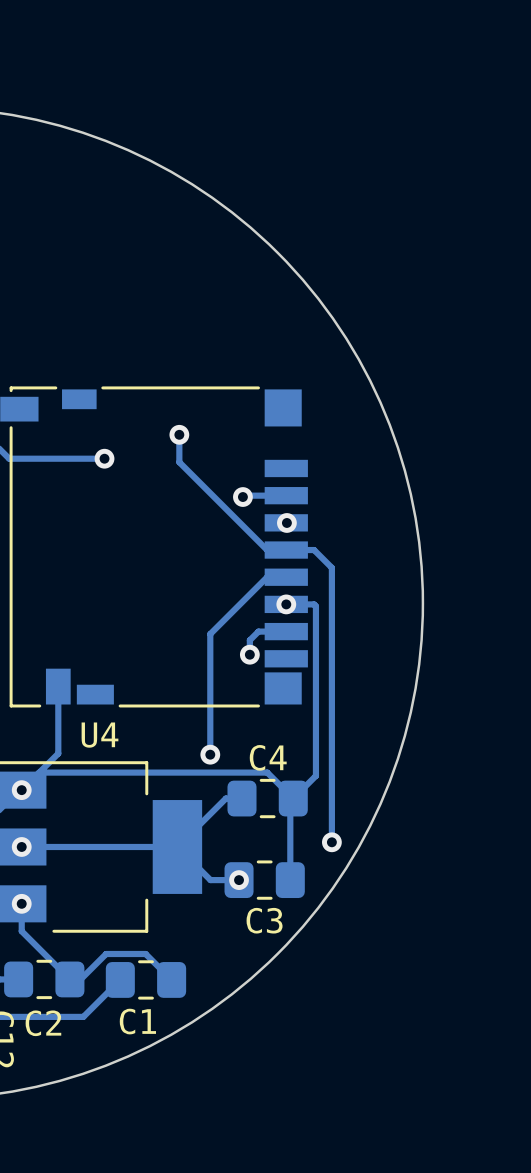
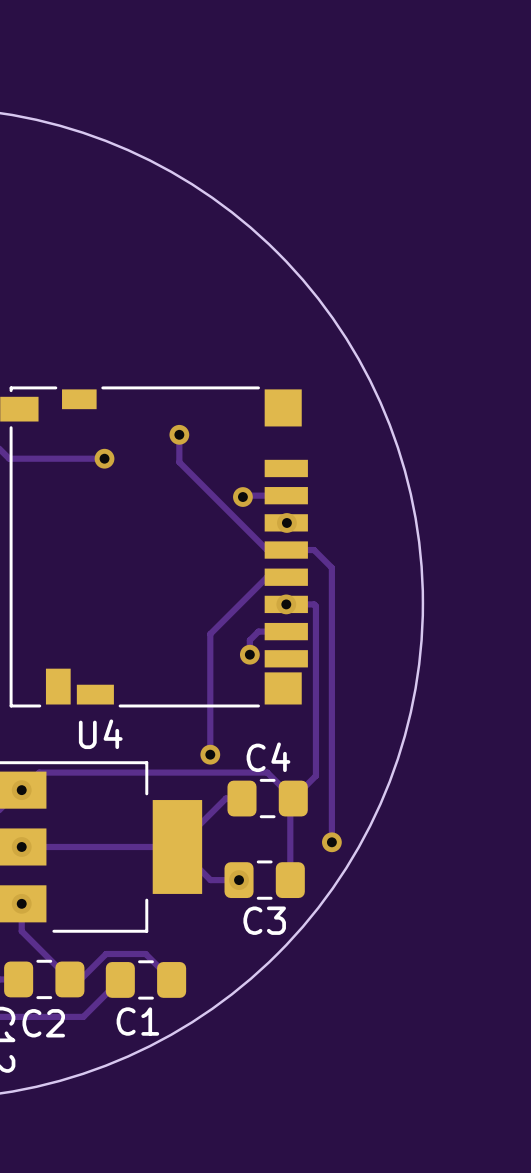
track: (58, 686) (58, 753) (39, 772) -> none

